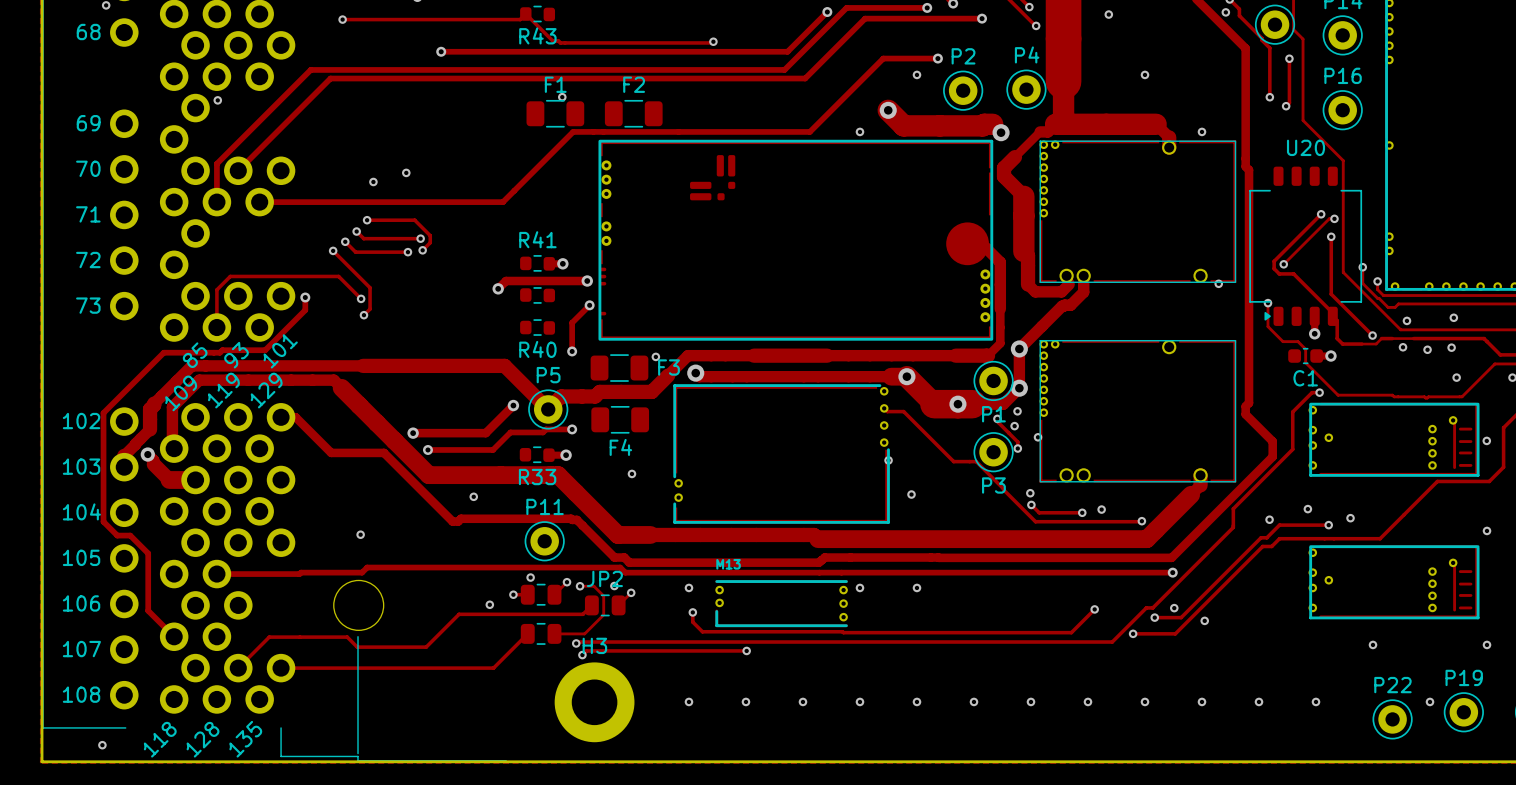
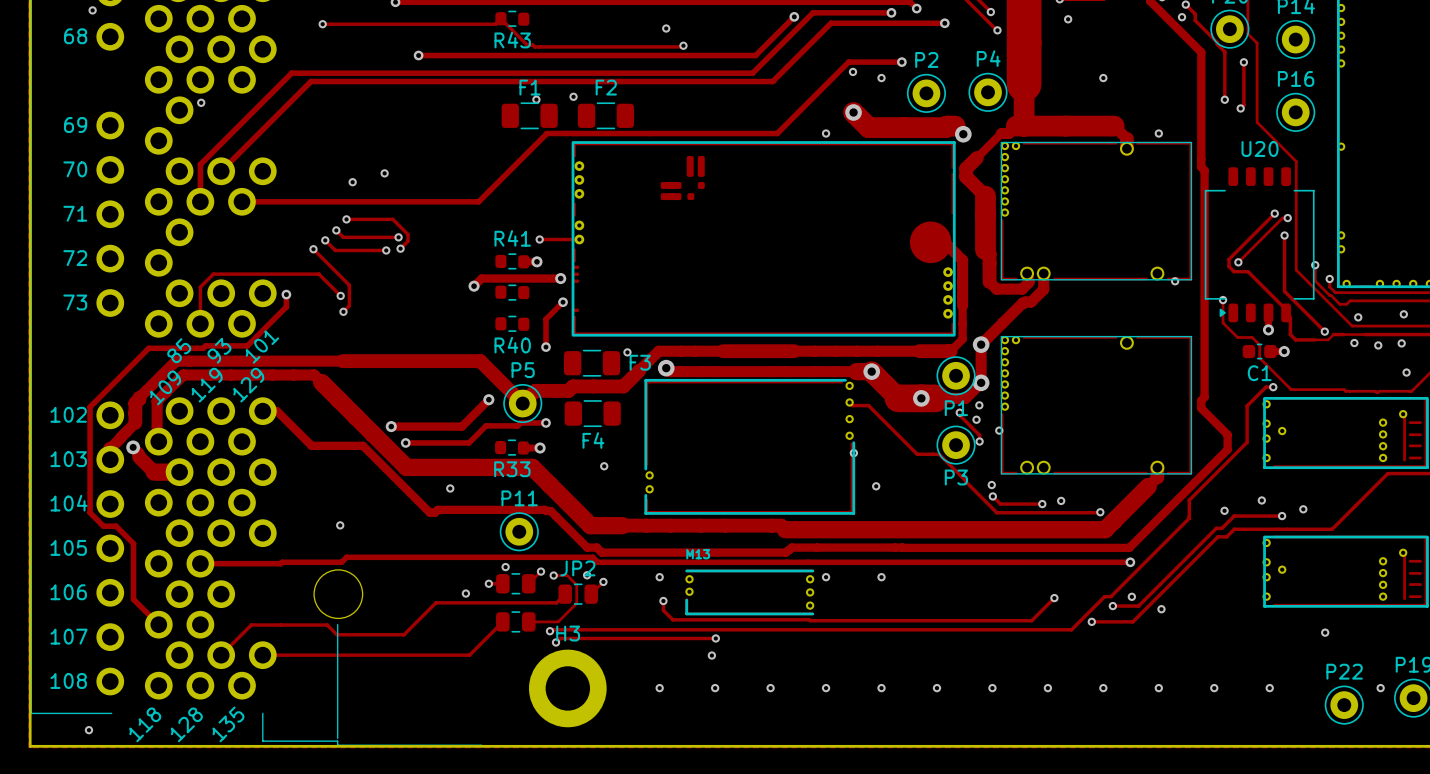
via: none -> (666, 28)
via: none -> (853, 71)
via: none -> (573, 96)
track: none -> (539, 239) (579, 239)
via: none -> (539, 239)
via: none -> (711, 655)

